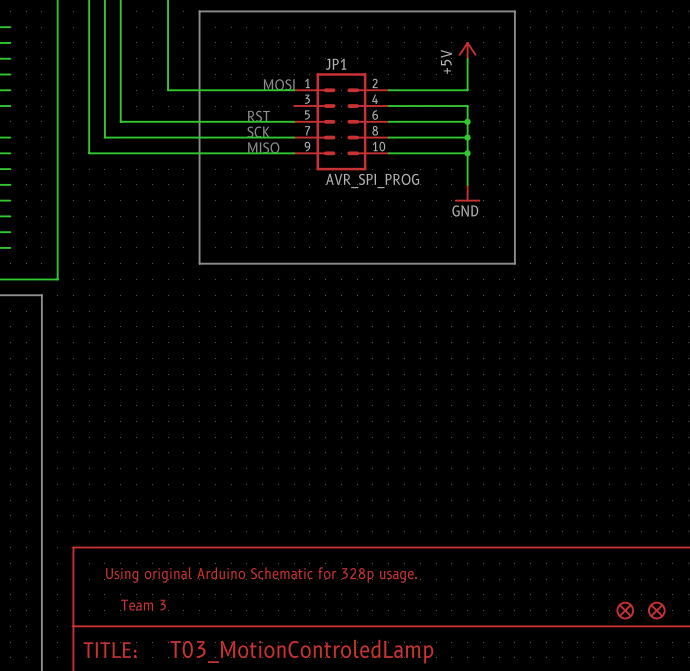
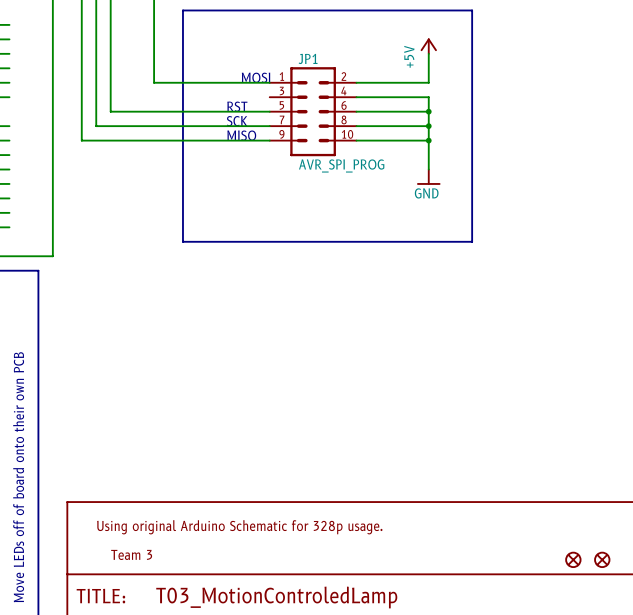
text: none -> Move LEDs off of board onto their own PCB (18, 477)

